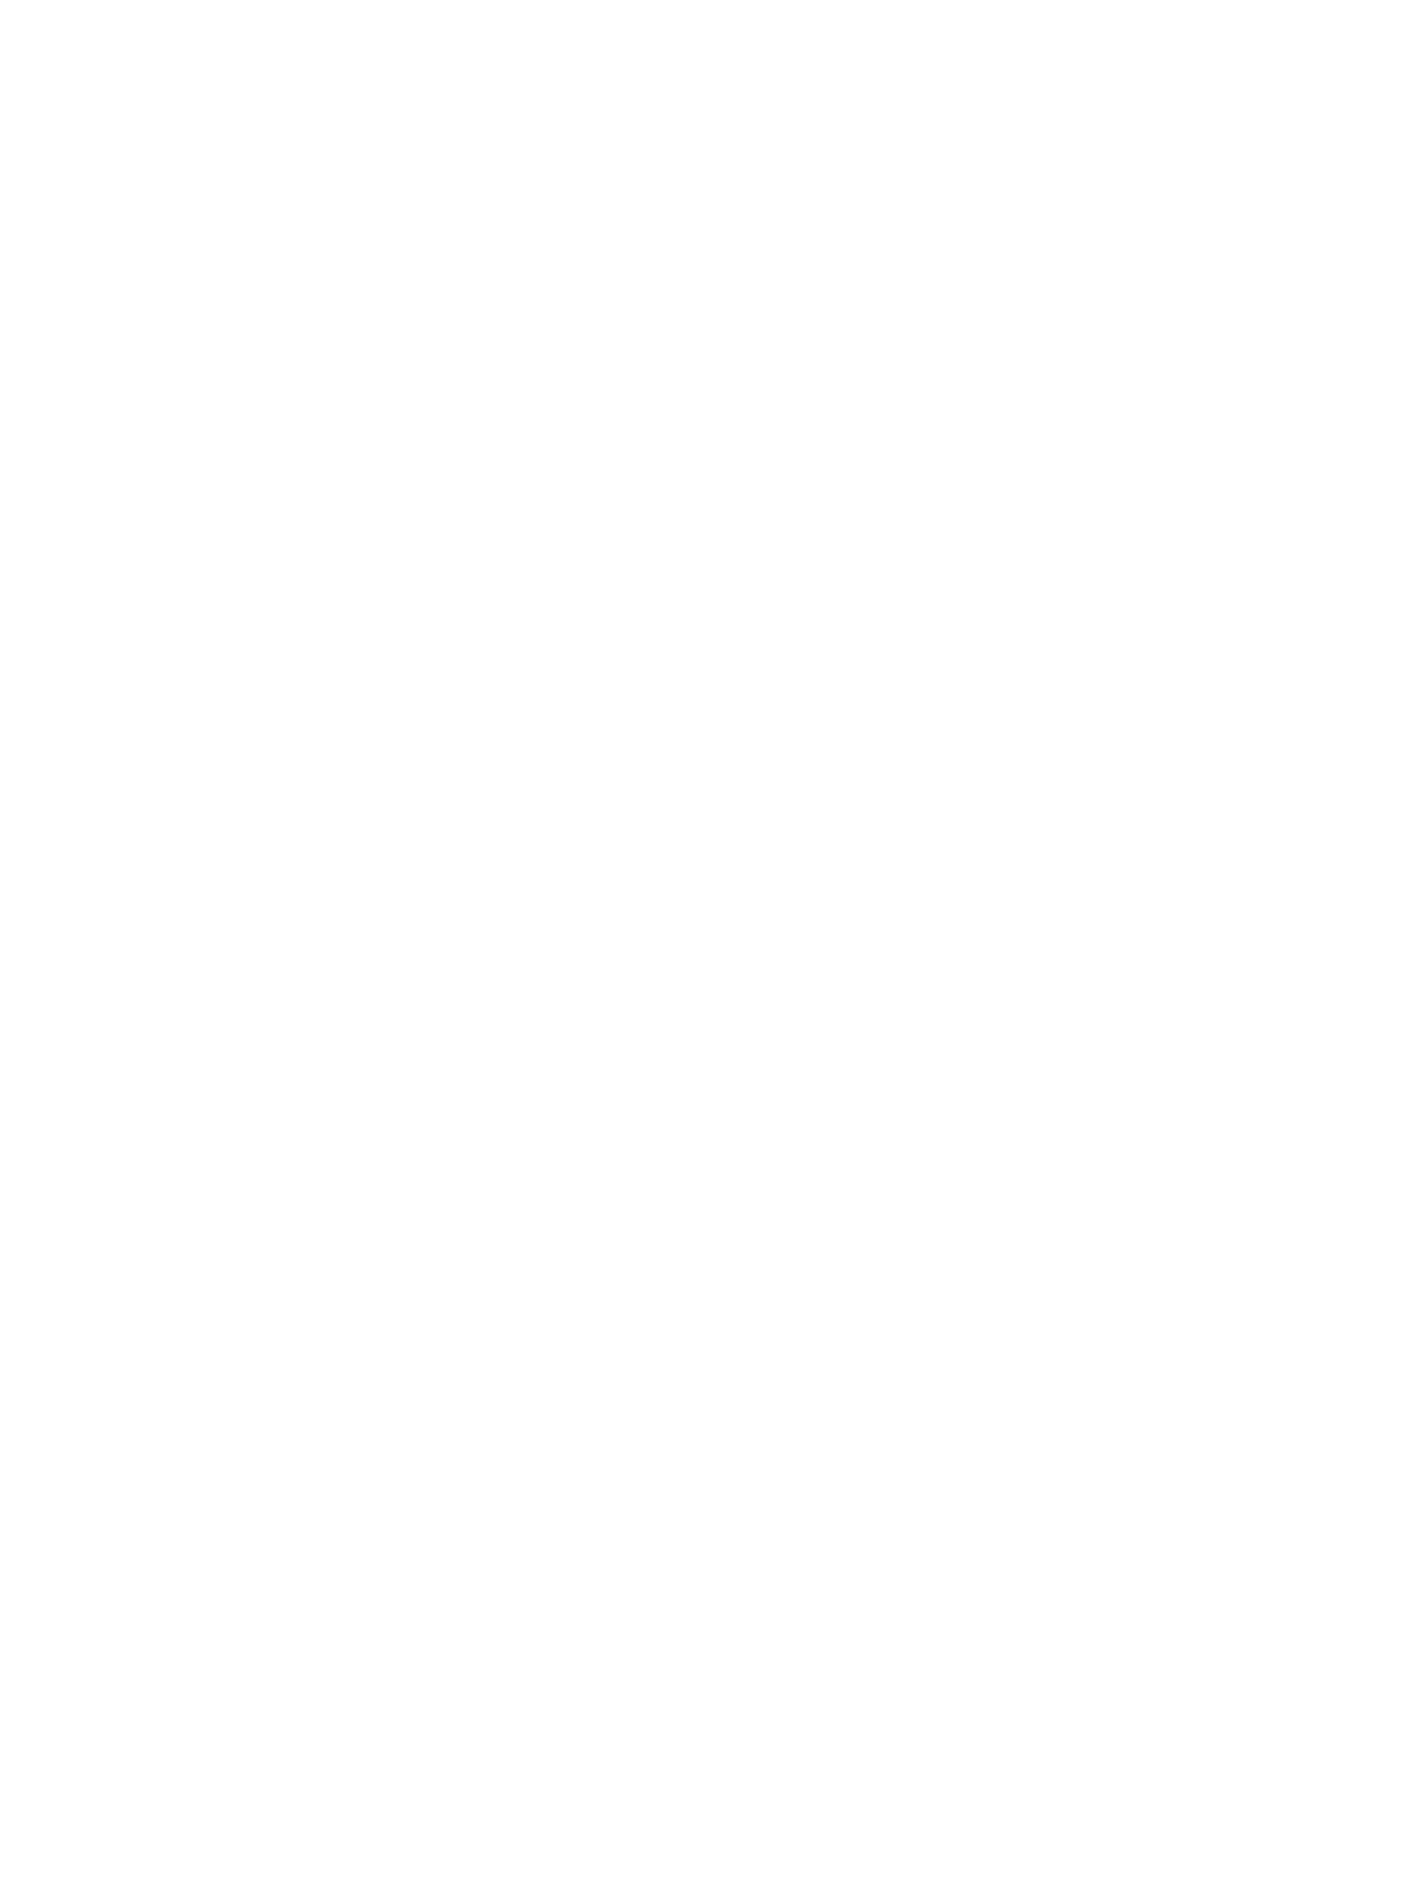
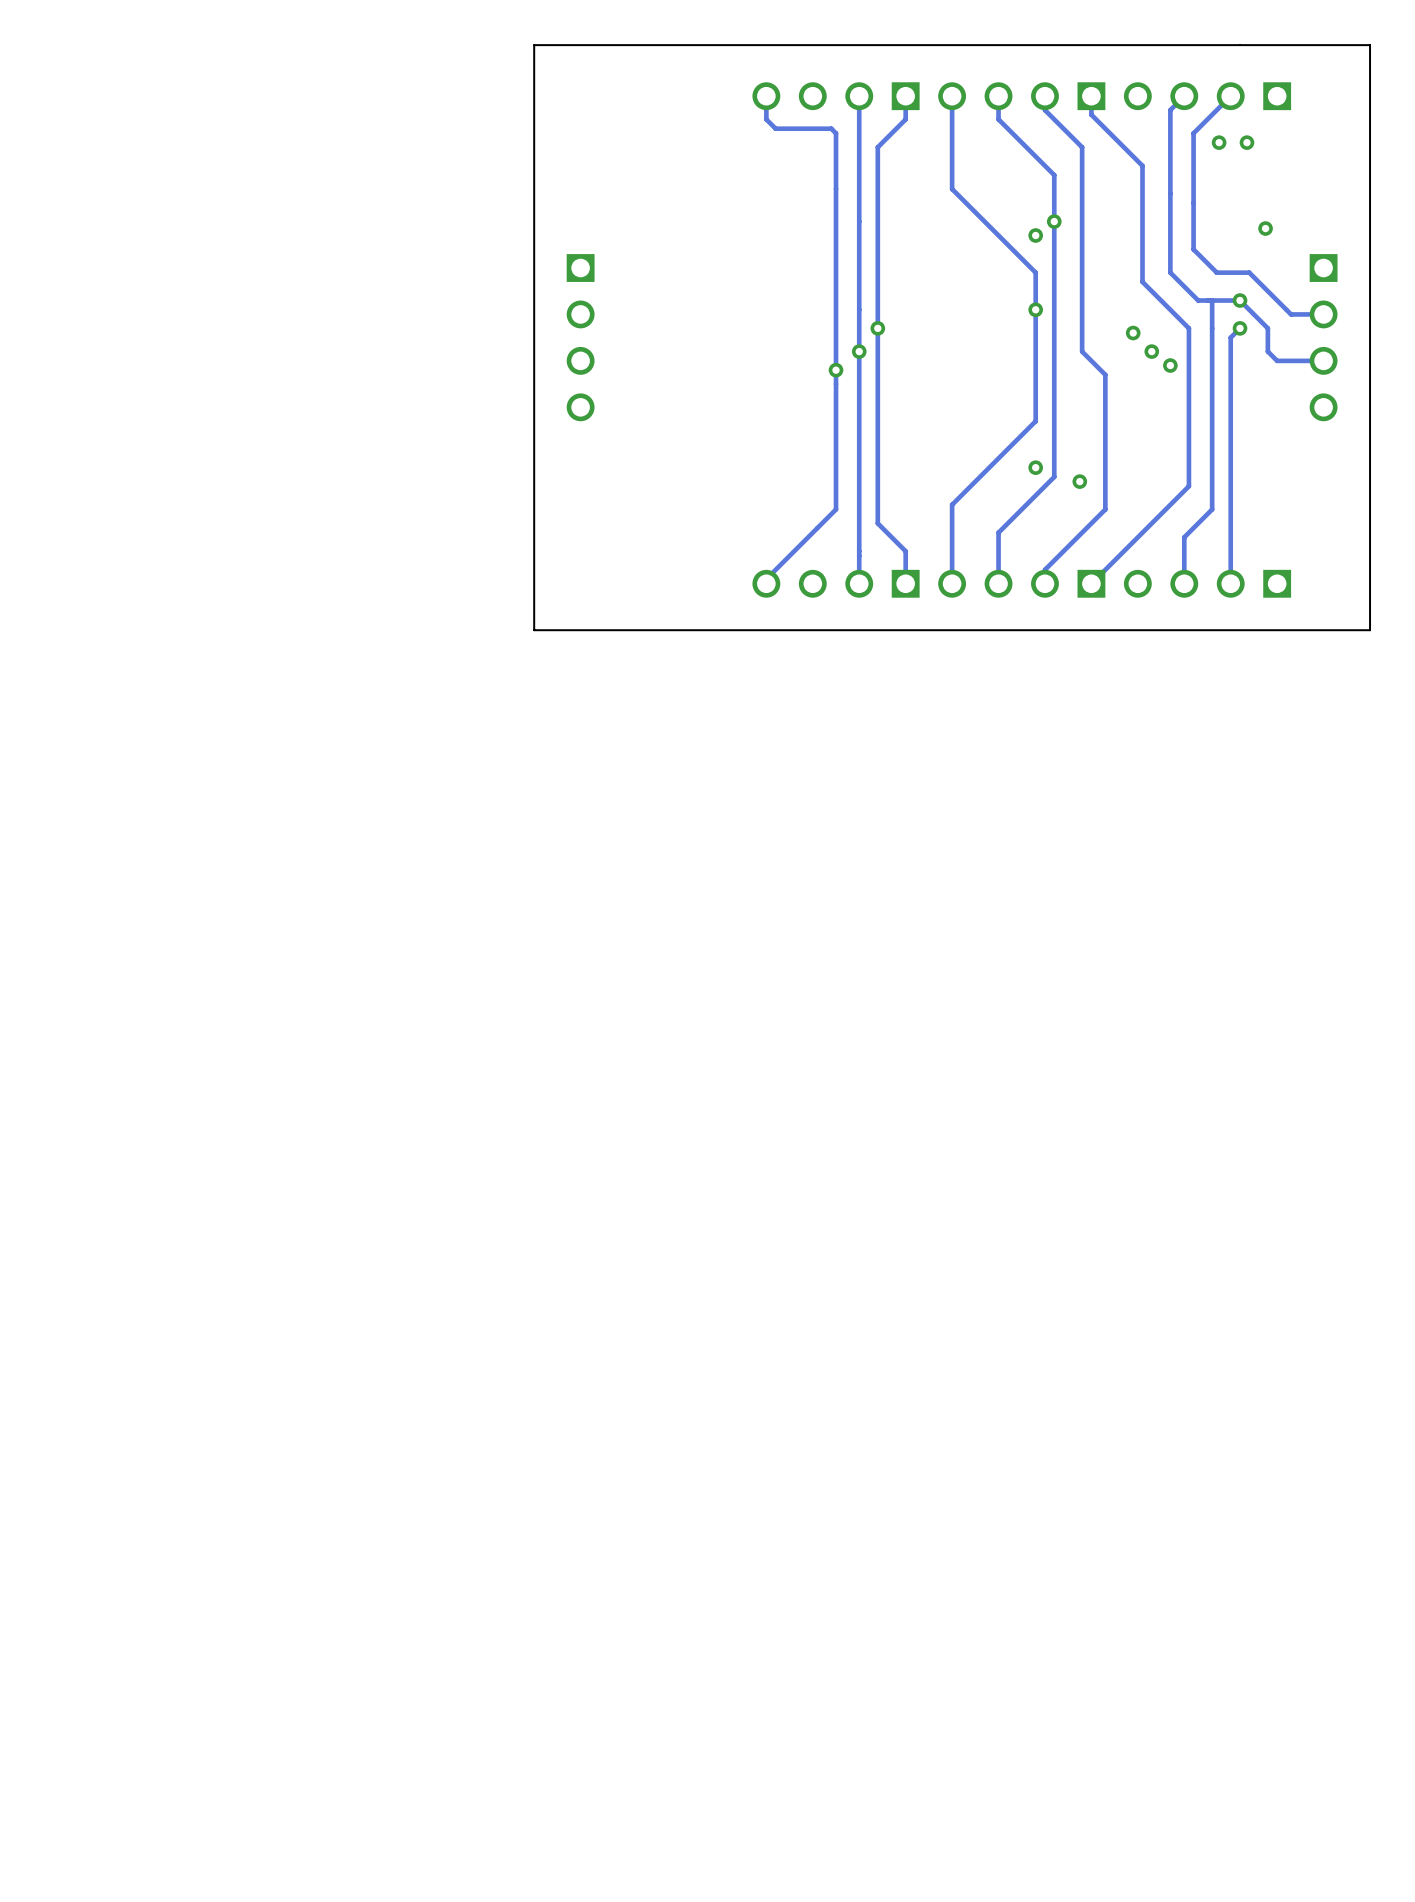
board edge: none -> (1370, 45) (534, 45) (534, 630) (1370, 630) (1370, 45)
track: none -> (766, 96) (766, 119) (775, 128) (831, 128) (836, 133) (836, 509) (766, 579) (766, 583)
part: none -> (836, 96)
track: none -> (859, 96) (859, 583)
track: none -> (905, 96) (905, 119) (877, 147) (877, 523) (905, 551) (905, 583)
track: none -> (952, 96) (952, 189) (1035, 272) (1035, 421) (952, 504) (952, 583)
track: none -> (998, 96) (998, 119) (1054, 175) (1054, 476) (998, 532) (998, 583)
part: none -> (1021, 96)
track: none -> (1044, 96) (1044, 110) (1082, 147) (1082, 351) (1105, 374) (1105, 509) (1044, 569) (1044, 583)
track: none -> (1091, 96) (1091, 114) (1142, 165) (1142, 281) (1188, 328) (1188, 486) (1091, 583)
track: none -> (1184, 96) (1170, 110) (1170, 272) (1198, 300) (1240, 300) (1267, 328) (1267, 351) (1277, 360) (1323, 360)
part: none -> (1207, 96)
track: none -> (1230, 96) (1193, 133) (1193, 249) (1216, 272) (1249, 272) (1291, 314) (1323, 314)
via: none -> (1219, 142)
via: none -> (1246, 142)
via: none -> (1054, 221)
via: none -> (1265, 228)
via: none -> (1035, 235)
track: none -> (1212, 300) (1212, 509) (1184, 537) (1184, 583)
via: none -> (1240, 300)
via: none -> (1035, 309)
via: none -> (877, 328)
track: none -> (1240, 328) (1230, 337) (1230, 583)
via: none -> (1240, 328)
via: none -> (1133, 333)
part: none -> (580, 337)
part: none -> (1323, 337)
via: none -> (859, 351)
via: none -> (1151, 351)
via: none -> (1170, 365)
via: none -> (836, 370)
via: none -> (1035, 467)
via: none -> (1079, 481)
part: none -> (836, 583)
part: none -> (1021, 583)
part: none -> (1207, 583)

